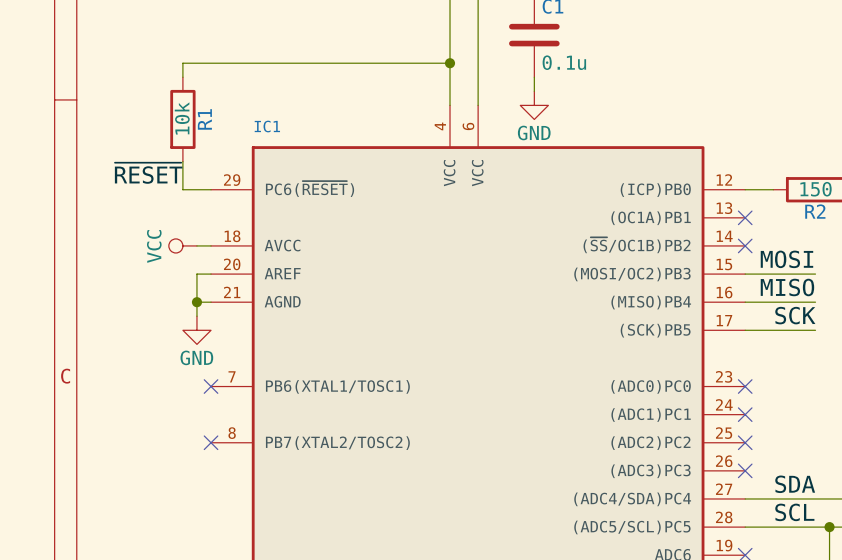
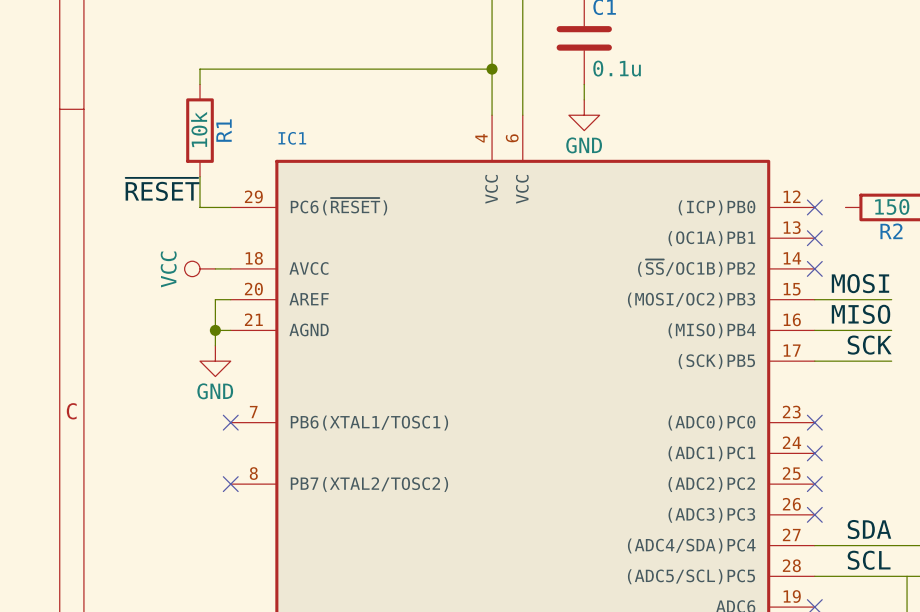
wire: (745, 189) (773, 189) -> none
no-connect mark: none -> (814, 207)
junction: (829, 527) -> none

